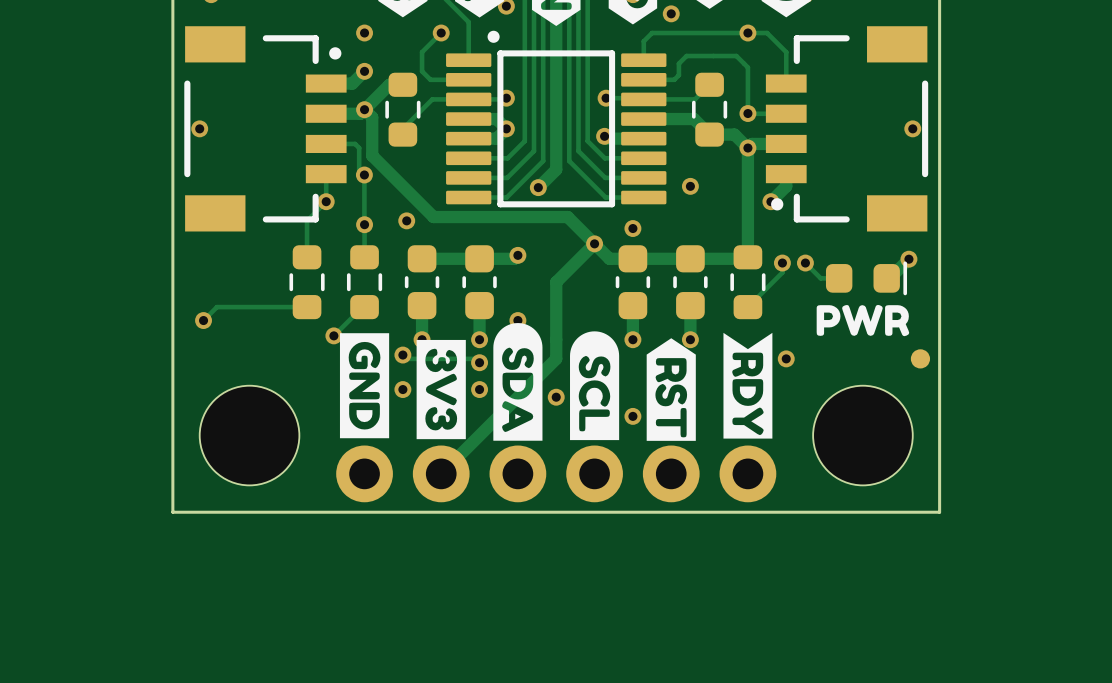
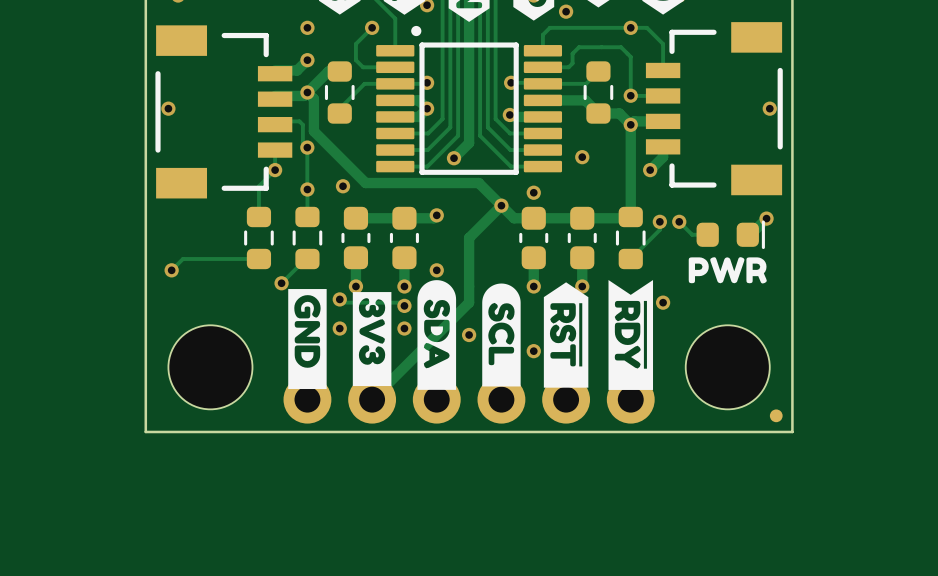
part footprint: [184, 26, 347, 232] -> [155, 25, 293, 199]
part footprint: [765, 26, 929, 232] -> [645, 22, 783, 196]
drawing shape: [493, 323, 543, 441] -> [417, 280, 457, 390]
drawing shape: [570, 331, 620, 441] -> [482, 283, 521, 387]
drawing shape: [723, 332, 773, 439] -> [608, 280, 654, 390]
drawing shape: [339, 333, 390, 439] -> [288, 289, 327, 390]
drawing shape: [646, 338, 696, 441] -> [543, 282, 589, 388]
drawing shape: [416, 339, 466, 440] -> [352, 292, 392, 387]
part: (920, 358) -> none
part: none -> (776, 415)

